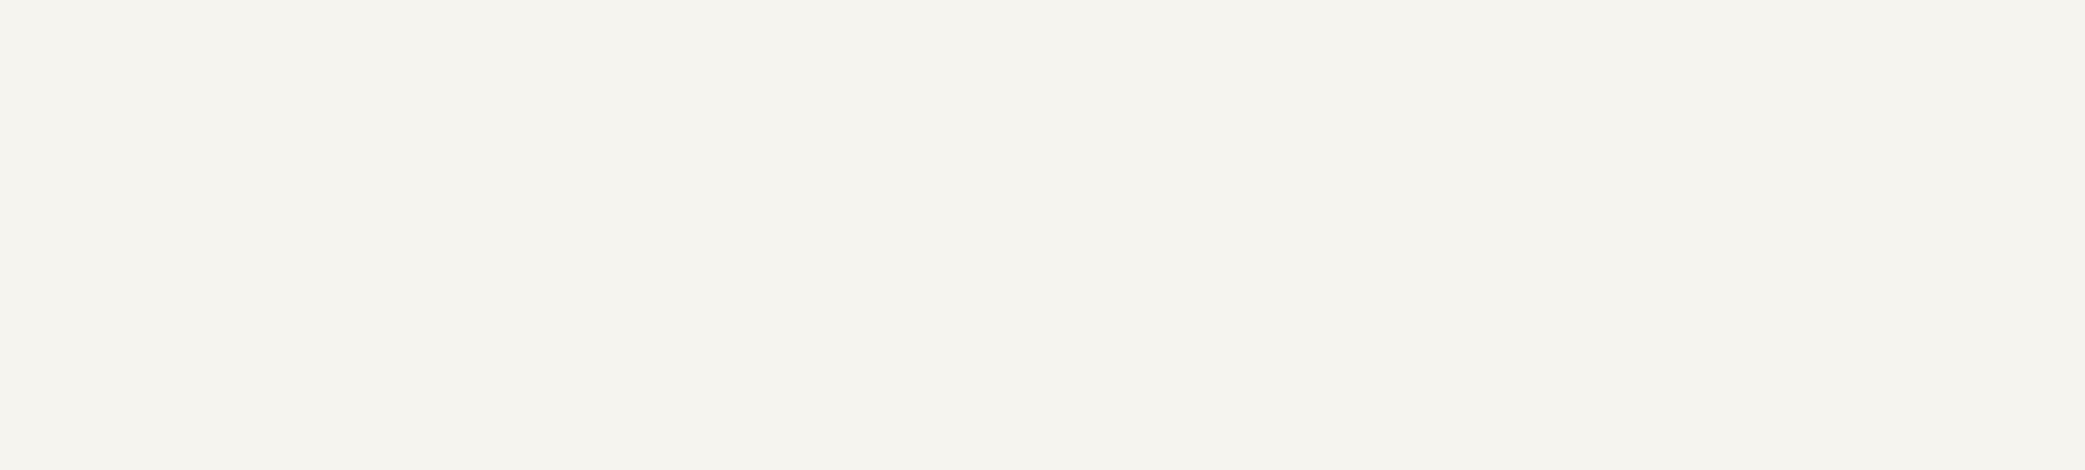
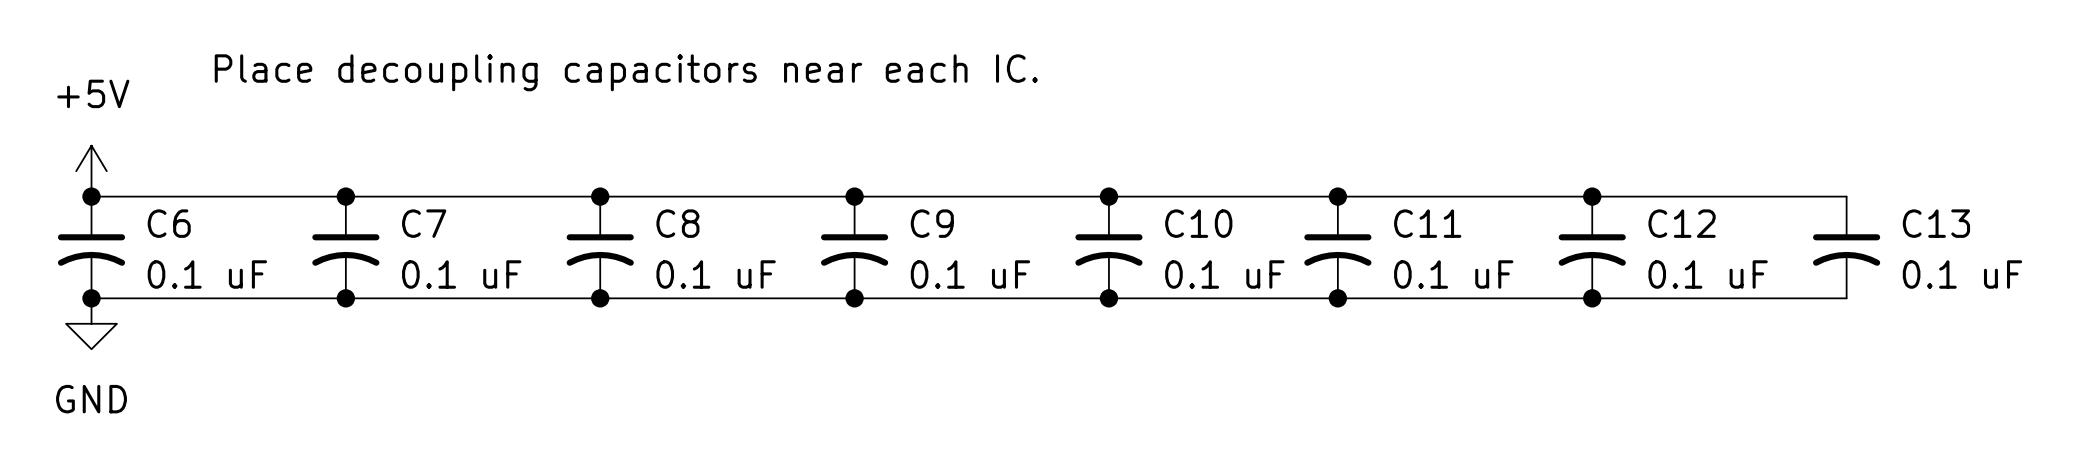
text: none -> Place decoupling capacitors near each IC. (626, 72)
power symbol: none -> +5V (91, 171)
wire: none -> (91, 196) (1846, 196)
junction: none -> (91, 196)
junction: none -> (345, 196)
junction: none -> (600, 196)
junction: none -> (854, 196)
junction: none -> (1108, 196)
junction: none -> (1337, 196)
junction: none -> (1592, 196)
C6: none -> 0.1 uF (91, 247)
C7: none -> 0.1 uF (345, 247)
C8: none -> 0.1 uF (600, 247)
C9: none -> 0.1 uF (854, 247)
C10: none -> 0.1 uF (1108, 247)
C11: none -> 0.1 uF (1337, 247)
C12: none -> 0.1 uF (1592, 247)
C13: none -> 0.1 uF (1846, 247)
wire: none -> (91, 298) (1846, 298)
junction: none -> (91, 298)
junction: none -> (345, 298)
junction: none -> (600, 298)
junction: none -> (854, 298)
junction: none -> (1108, 298)
junction: none -> (1337, 298)
junction: none -> (1592, 298)
power symbol: none -> GND (91, 323)

